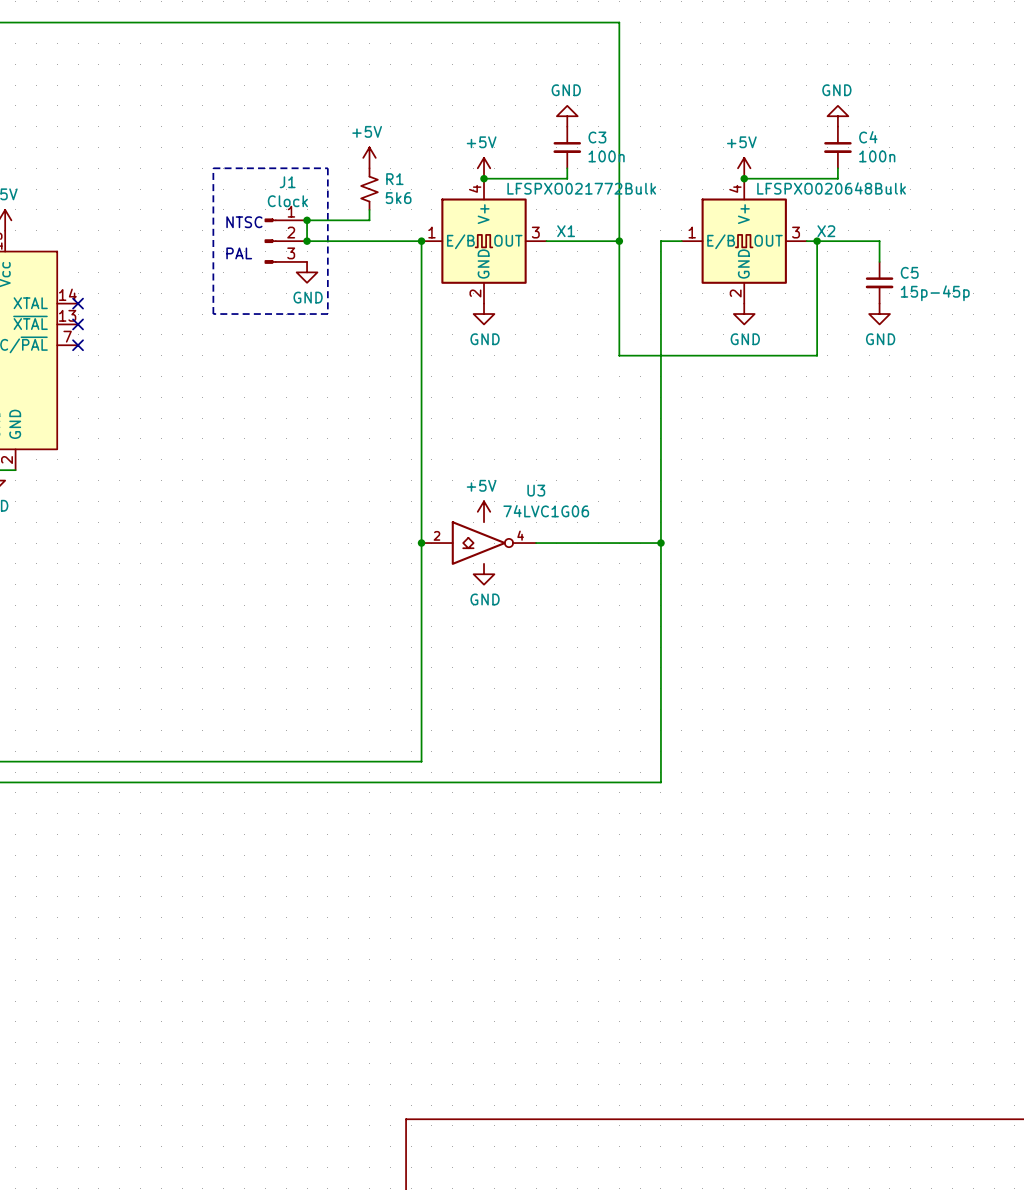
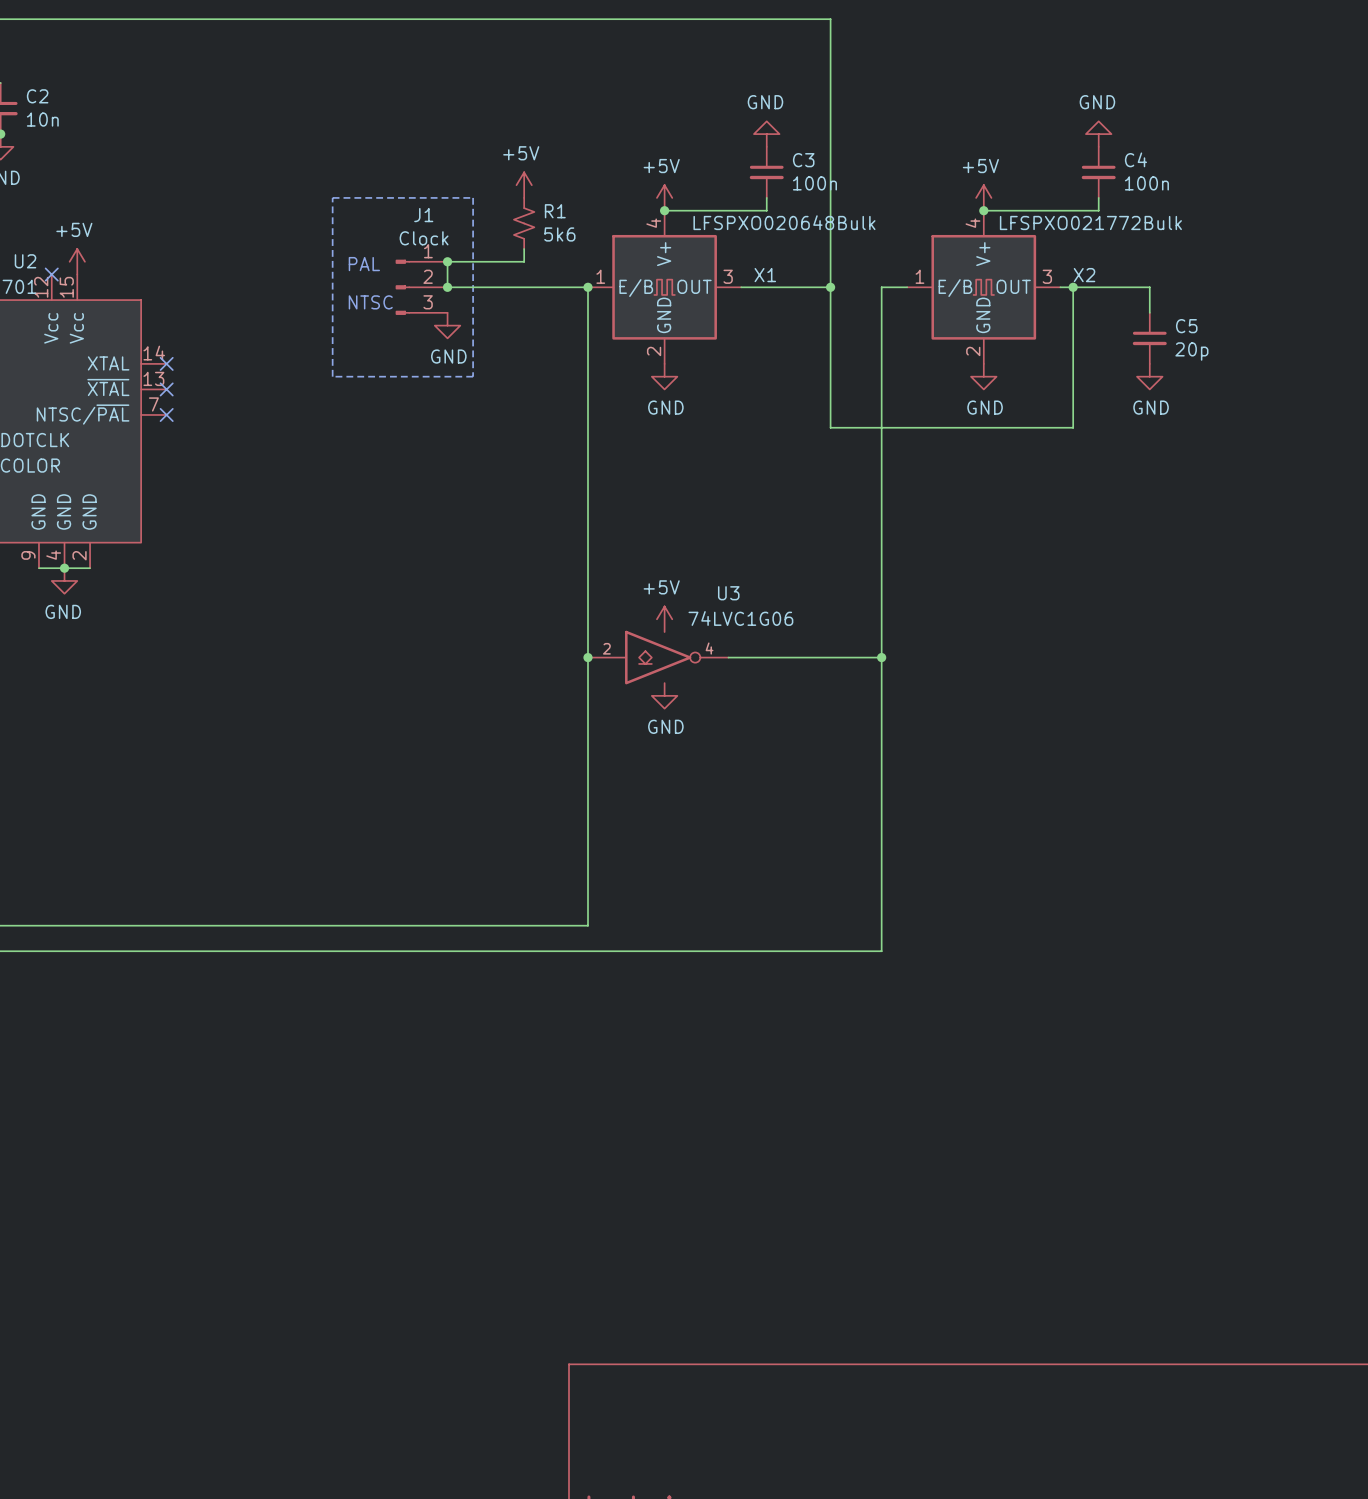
X1 value: LFSPXO021772Bulk (581, 188) -> LFSPXO020648Bulk (784, 222)
X2 value: LFSPXO020648Bulk (831, 188) -> LFSPXO021772Bulk (1090, 222)
text: NTSC (244, 222) -> PAL (364, 264)
text: PAL (239, 253) -> NTSC (370, 302)
C5 value: 15p-45p (935, 293) -> 20p (1191, 351)

